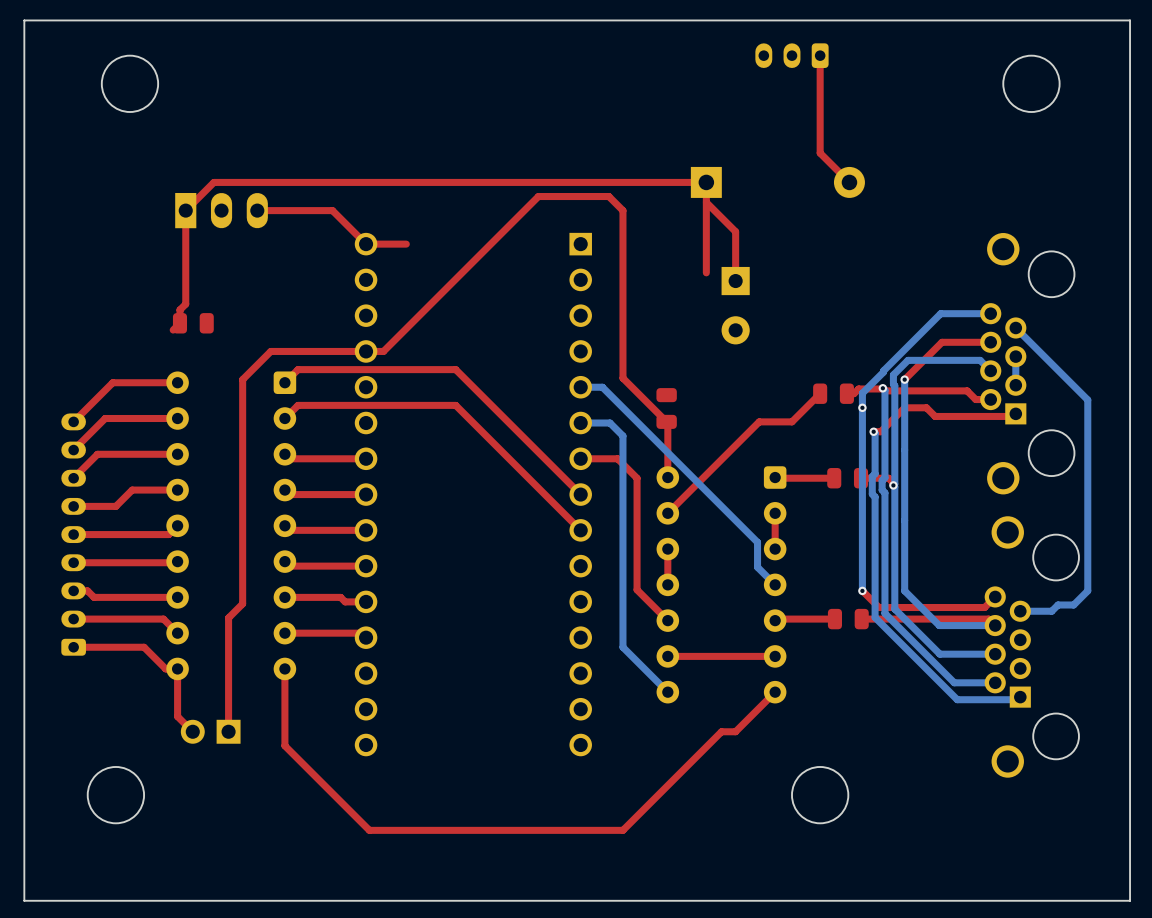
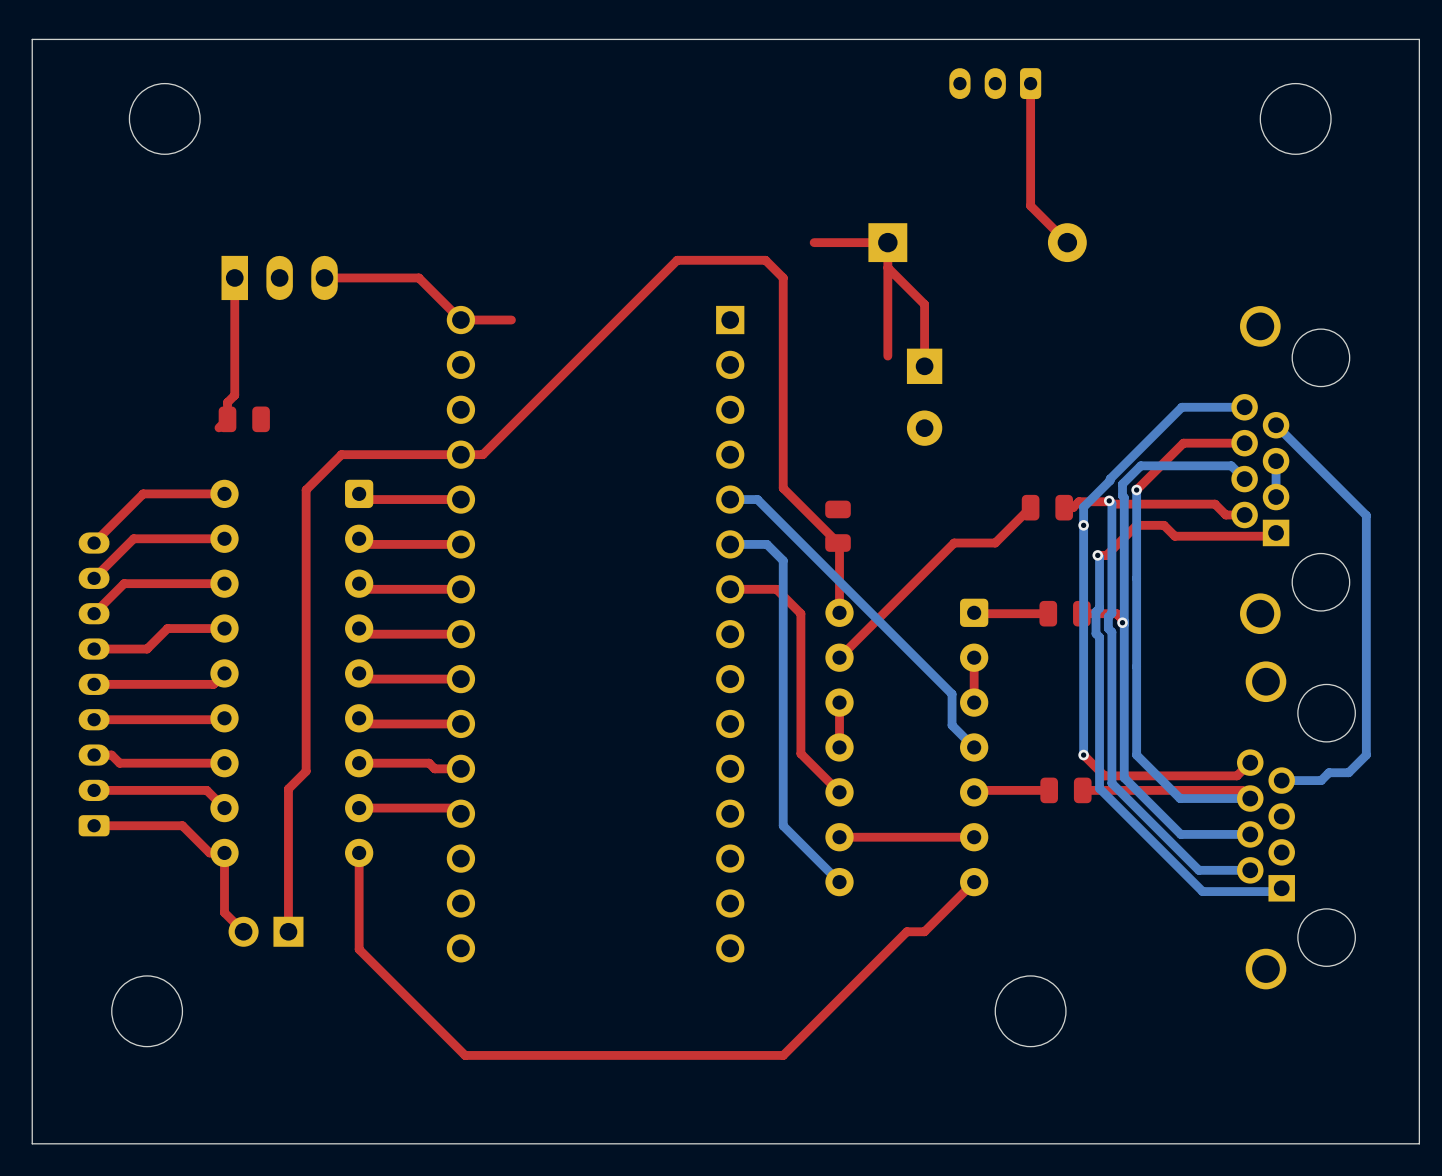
top track: (647, 182) (213, 182) (185, 210) -> none
top track: (284, 382) (298, 369) (455, 369) (580, 494) -> none
top track: none -> (460, 499) (364, 499)
top track: (284, 418) (298, 405) (455, 405) (580, 530) -> none
top track: none -> (460, 544) (364, 544)

